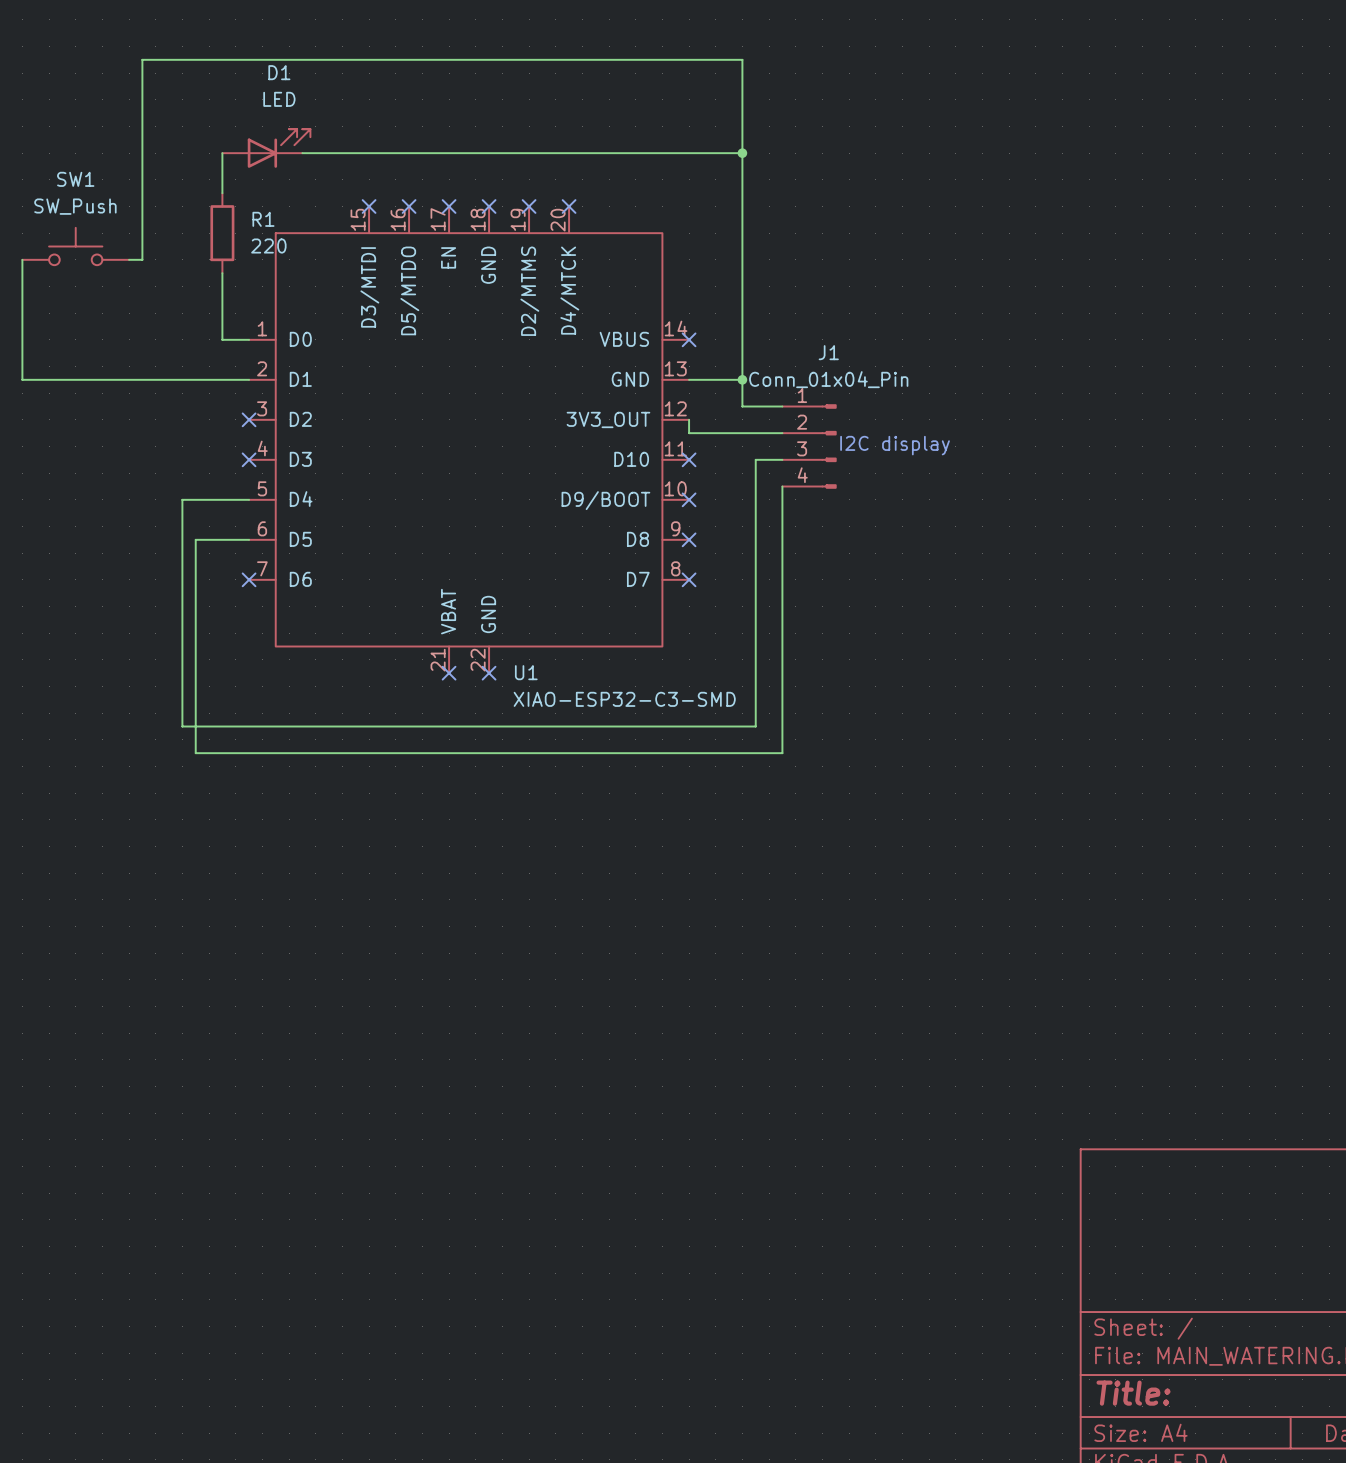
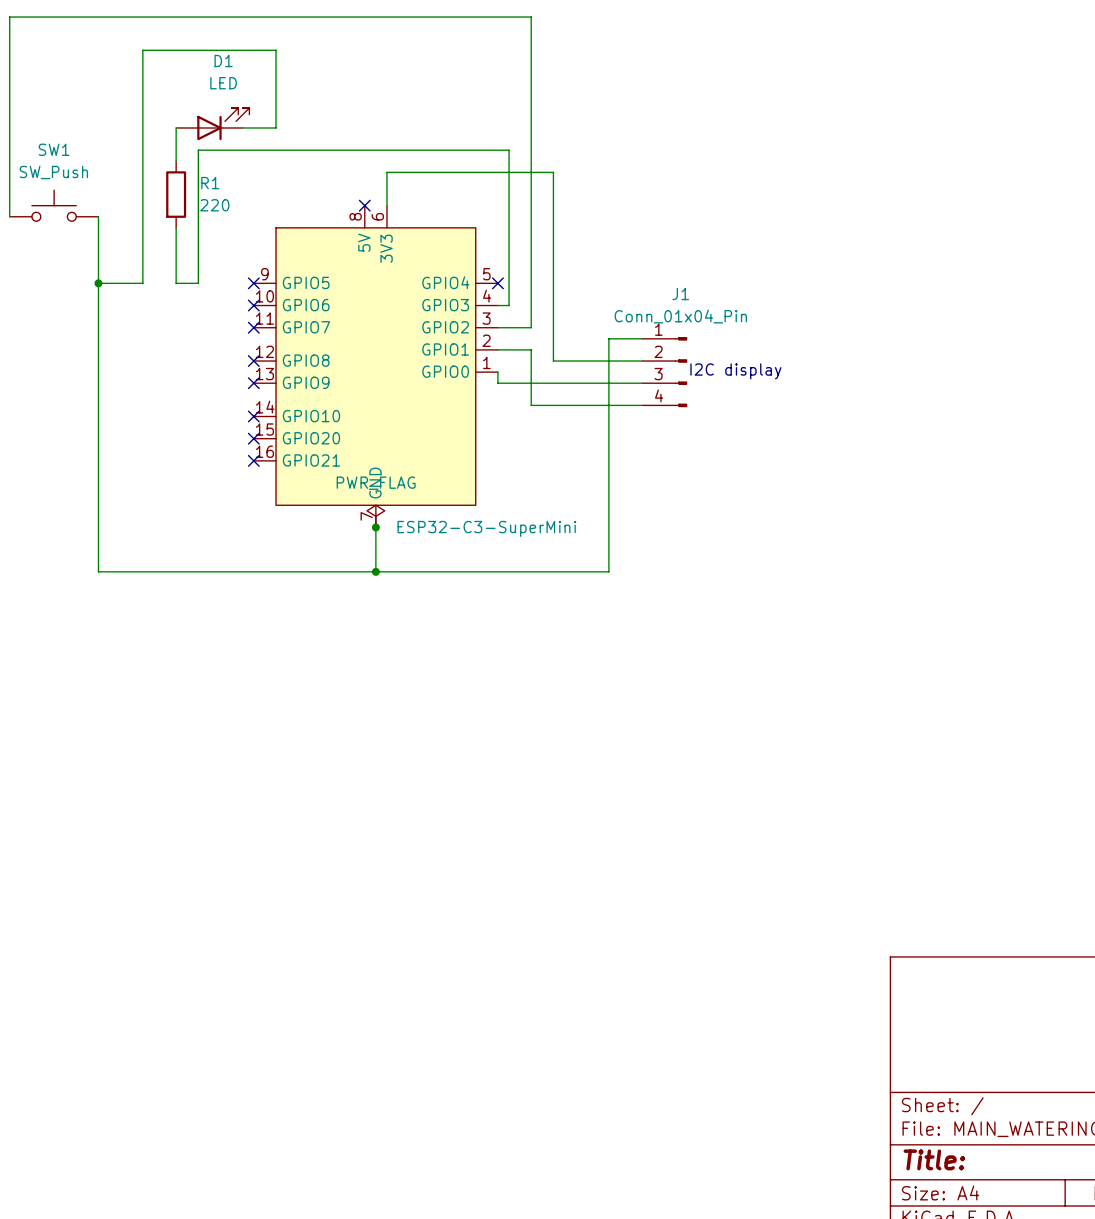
wire: (182, 59) (142, 59) (142, 259) (129, 259) -> (142, 50) (142, 283) (98, 283)
wire: (342, 59) (742, 59) (742, 406) -> (98, 216) (98, 571) (608, 571) (608, 338)
wire: (342, 153) (742, 153) -> (276, 127) (276, 50)
junction: (742, 153) -> none
no-connect mark: (369, 206) -> none
no-connect mark: (409, 206) -> none
no-connect mark: (449, 206) -> none
no-connect mark: (489, 206) -> none
no-connect mark: (529, 206) -> none
no-connect mark: (569, 206) -> none
no-connect mark: none -> (364, 205)
wire: (22, 259) (22, 379) (249, 379) -> (9, 216) (9, 17) (531, 17) (531, 327) (497, 327)
junction: none -> (98, 283)
wire: none -> (198, 283) (198, 150) (509, 150) (509, 305) (497, 305)
no-connect mark: none -> (253, 283)
no-connect mark: none -> (497, 283)
no-connect mark: (689, 339) -> none
no-connect mark: none -> (253, 305)
wire: (689, 379) (742, 379) -> none
junction: (742, 379) -> none
no-connect mark: none -> (253, 327)
no-connect mark: (249, 419) -> none
wire: (689, 419) (689, 433) -> (386, 205) (386, 172) (553, 172) (553, 361) (564, 361)
no-connect mark: none -> (253, 361)
part: none -> ESP32-C3-SuperMini (375, 366)
U1: XIAO-ESP32-C3-SMD (469, 439) -> none
no-connect mark: (249, 459) -> none
no-connect mark: none -> (253, 383)
no-connect mark: (689, 459) -> none
wire: (755, 459) (755, 726) (182, 726) (182, 499) (249, 499) -> (620, 383) (497, 383) (497, 372)
wire: (782, 486) (782, 753) (195, 753) (195, 539) (249, 539) -> (642, 405) (531, 405) (531, 349) (497, 349)
no-connect mark: none -> (253, 416)
no-connect mark: (689, 499) -> none
no-connect mark: none -> (253, 438)
no-connect mark: (689, 539) -> none
no-connect mark: none -> (253, 460)
no-connect mark: (249, 579) -> none
no-connect mark: (689, 579) -> none
power symbol: none -> PWR_FLAG (375, 516)
wire: none -> (375, 527) (375, 571)
junction: none -> (375, 527)
no-connect mark: (449, 673) -> none
no-connect mark: (489, 673) -> none
junction: none -> (375, 571)

